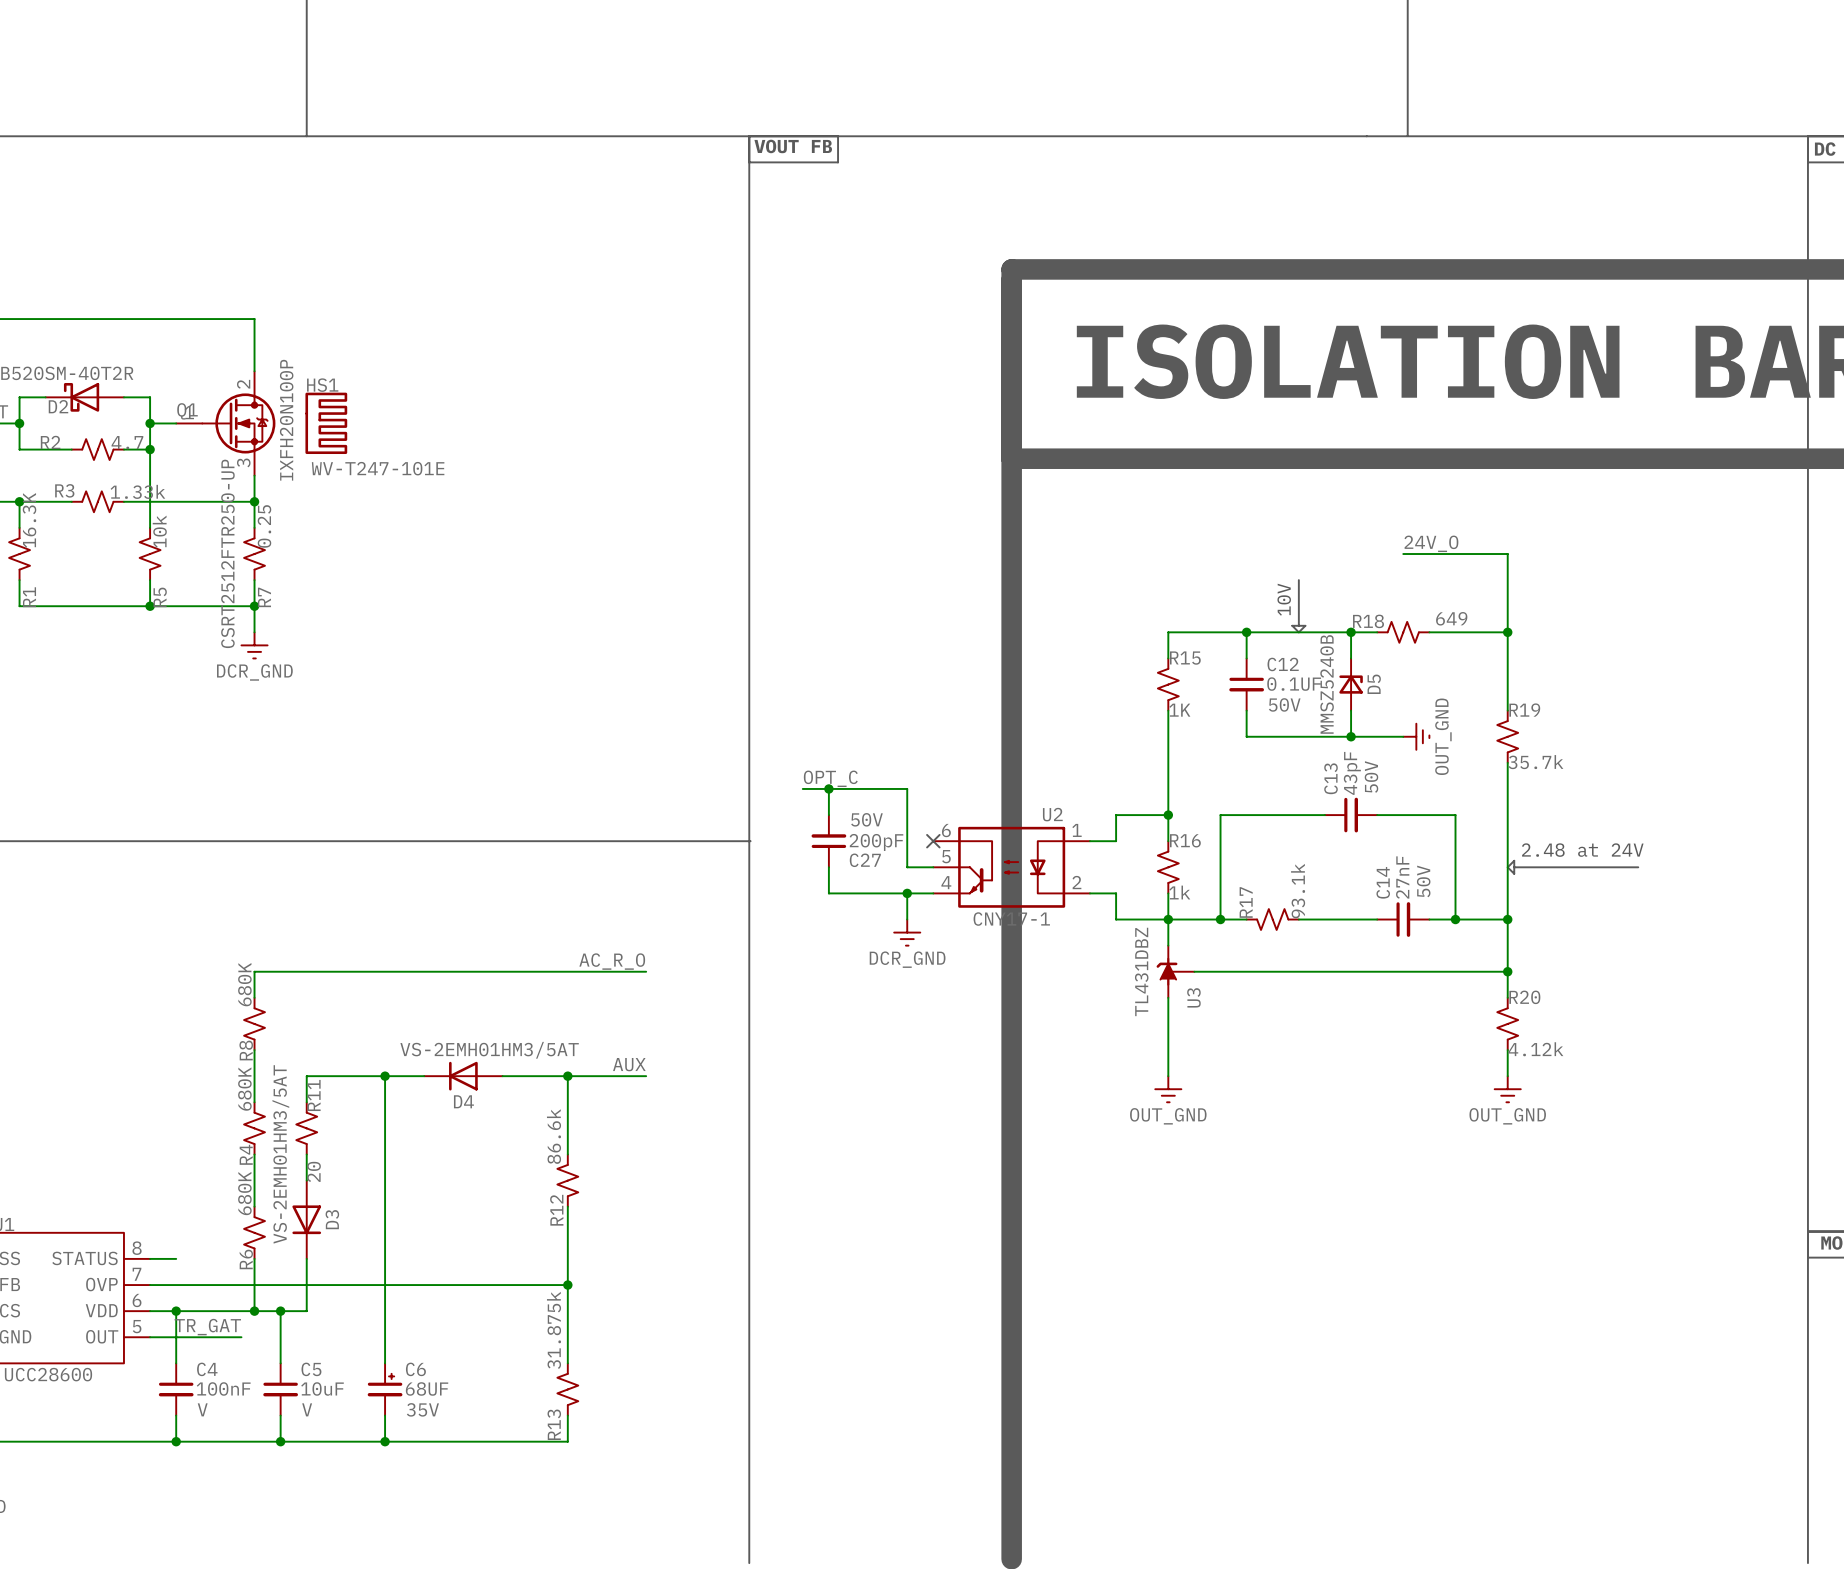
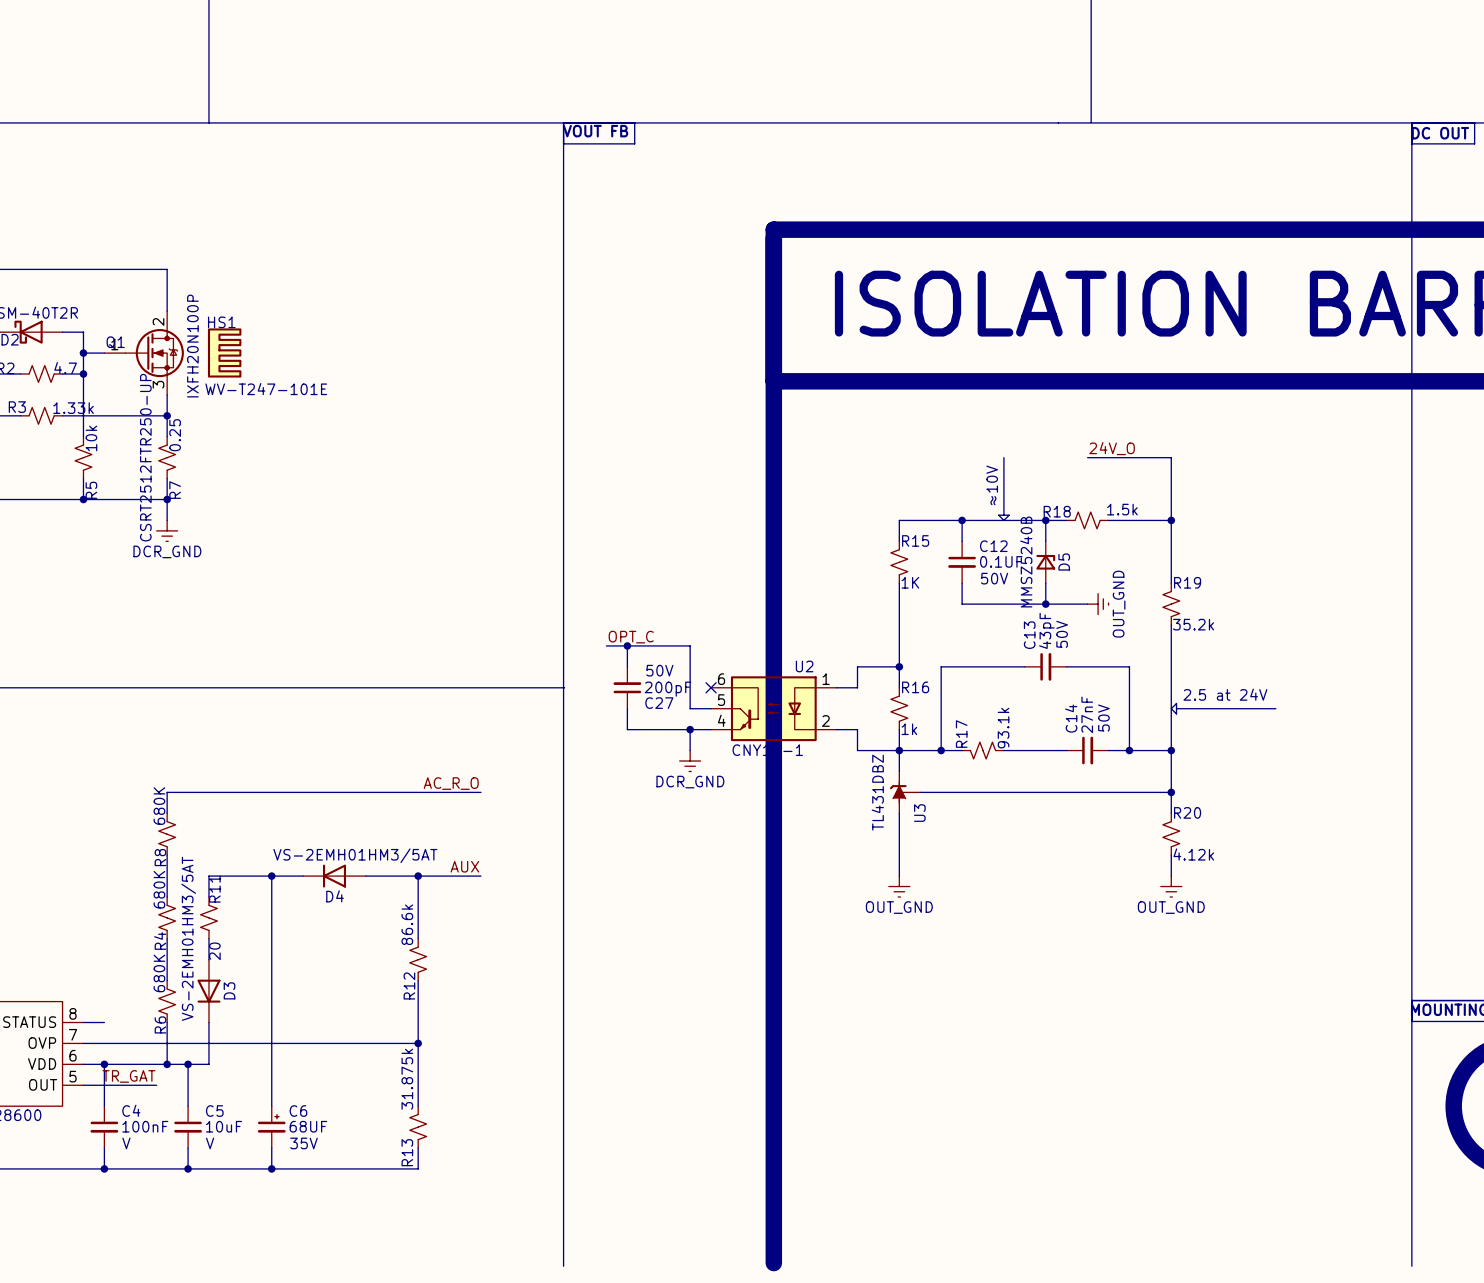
line: none -> (1003, 457) (1003, 478)
text: 10V (1284, 599) -> ≈10V (992, 485)
R18 value: 649 (1451, 618) -> 1.5k (1122, 509)
R19 value: 35.7k (1535, 762) -> 35.2k (1193, 624)
text: 2.48 at 24V (1582, 850) -> 2.5 at 24V (1225, 694)

